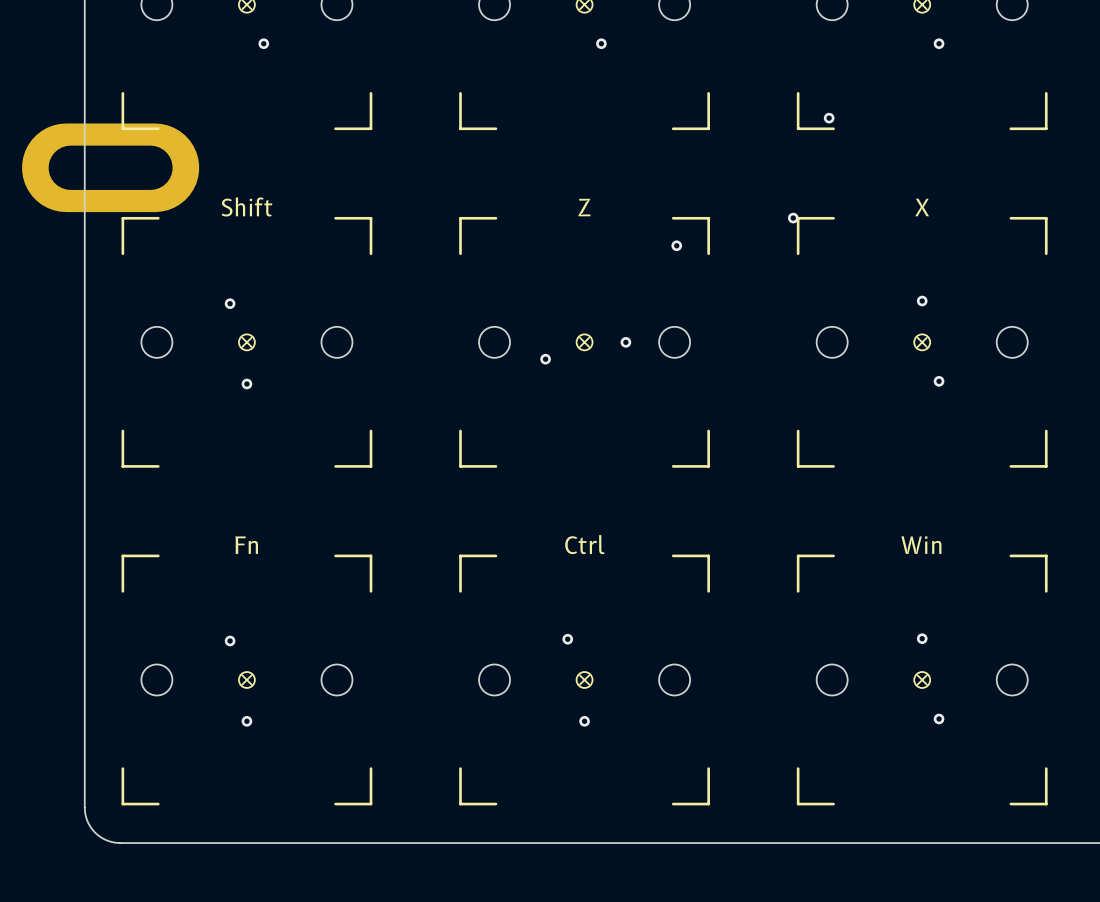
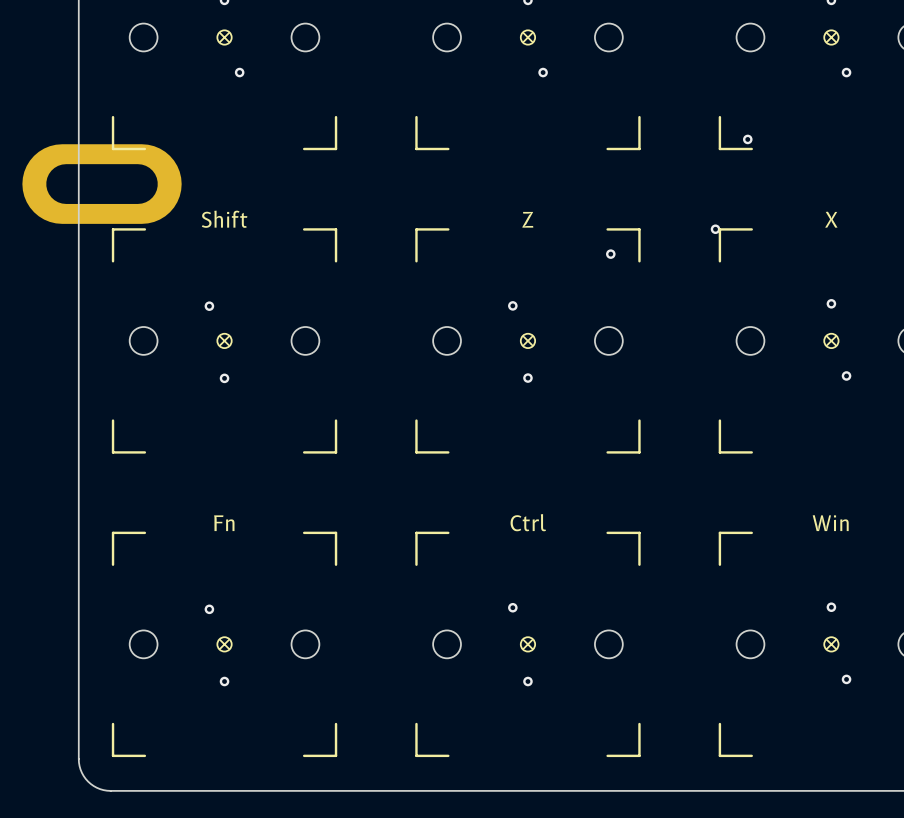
via: none -> (512, 305)
via: (625, 342) -> none
via: (545, 359) -> none
via: none -> (527, 378)

